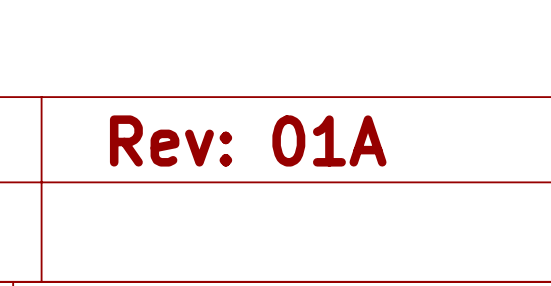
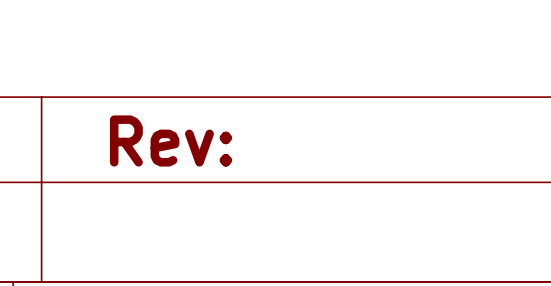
title block: Rev: 01A (248, 140) -> Rev: (171, 140)

